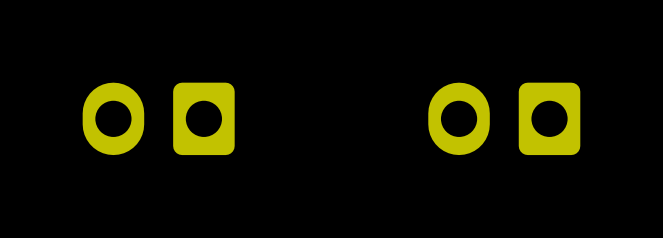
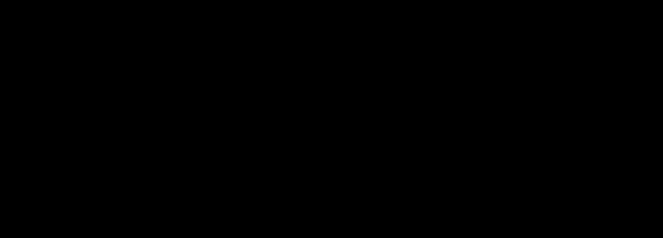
part: (158, 118) -> none
part: (504, 118) -> none

